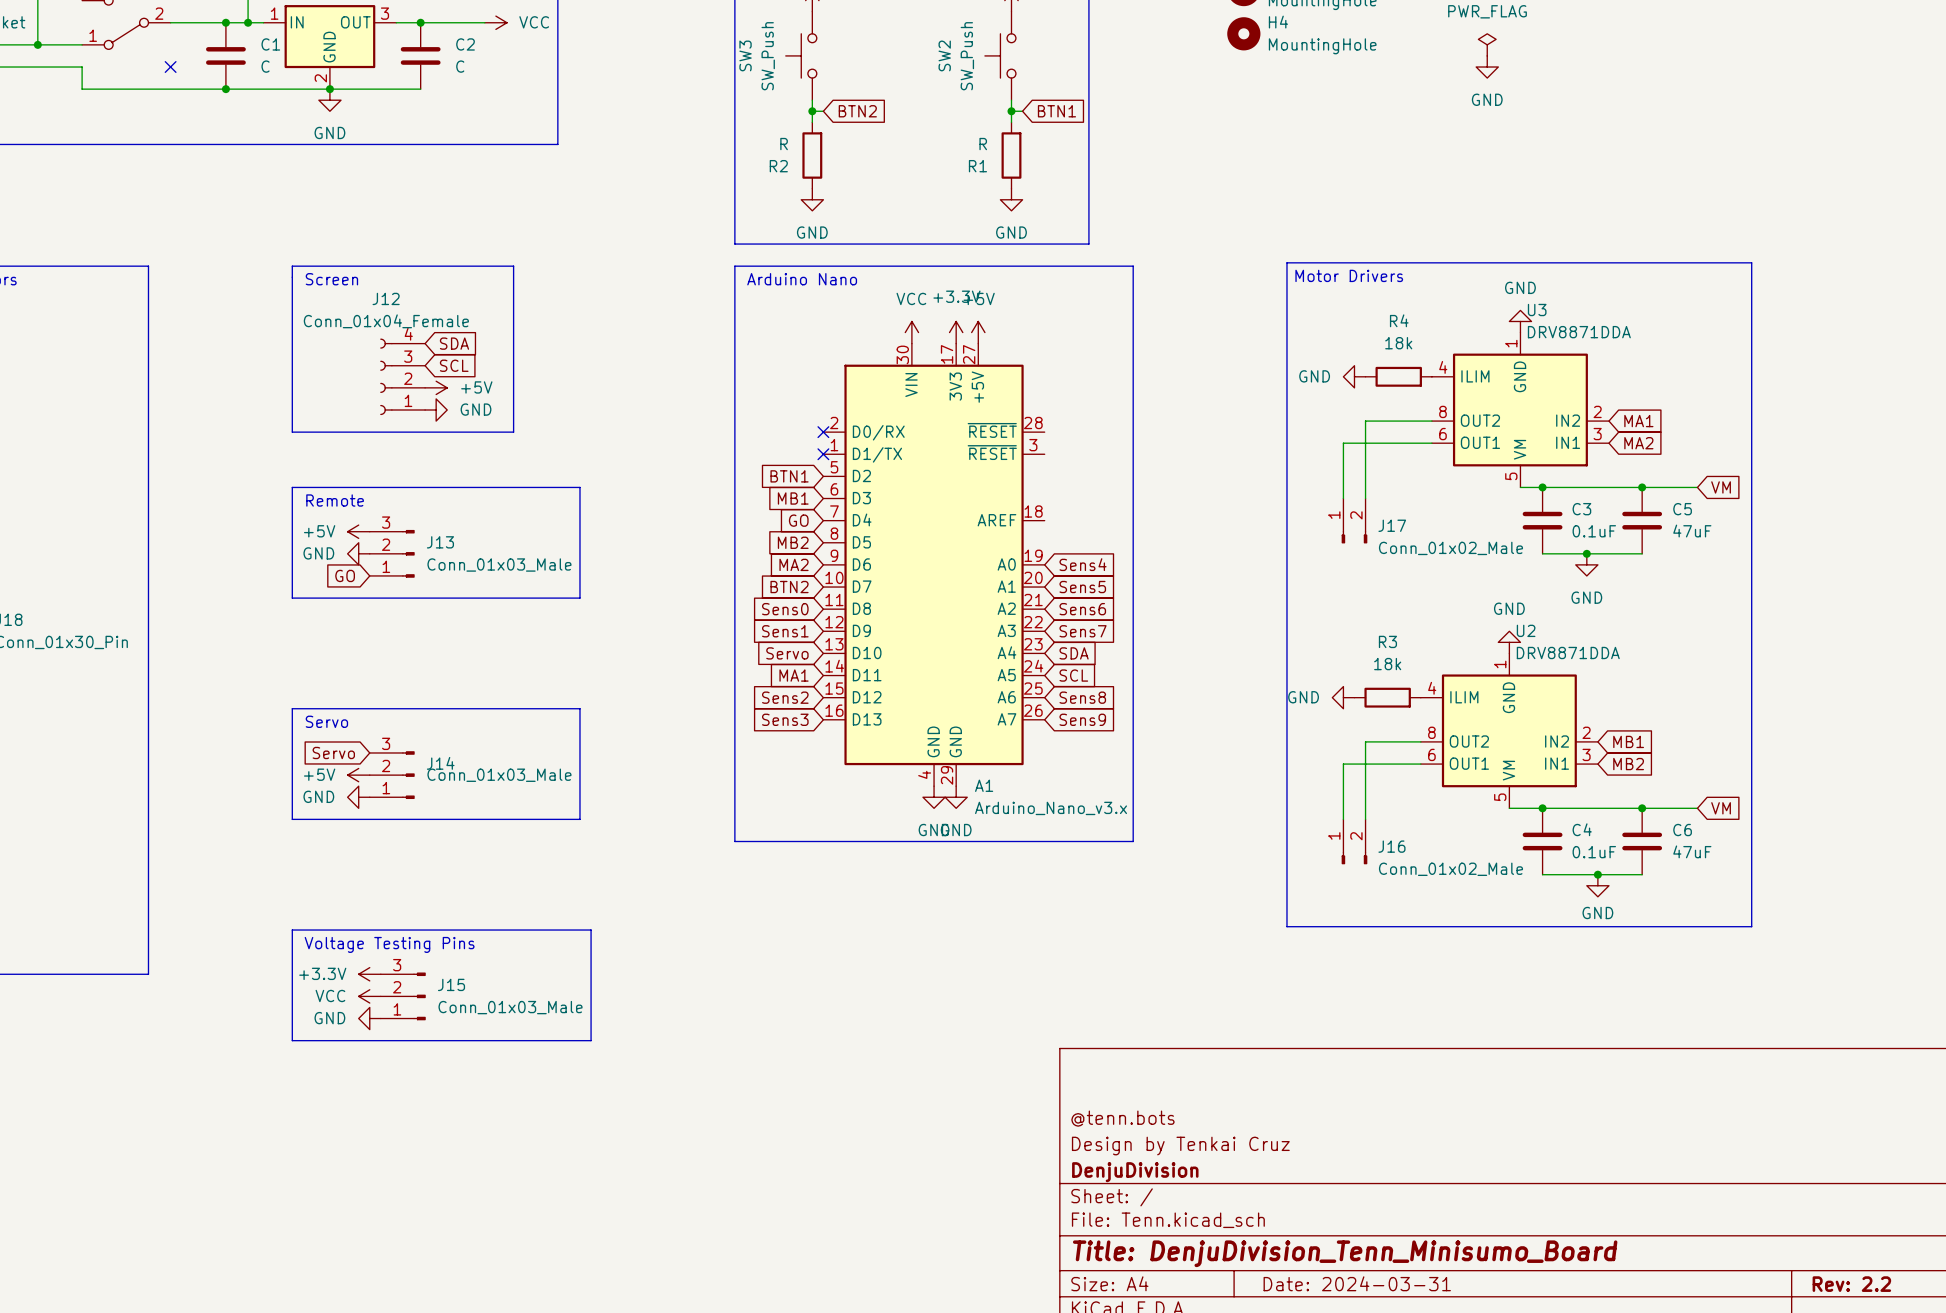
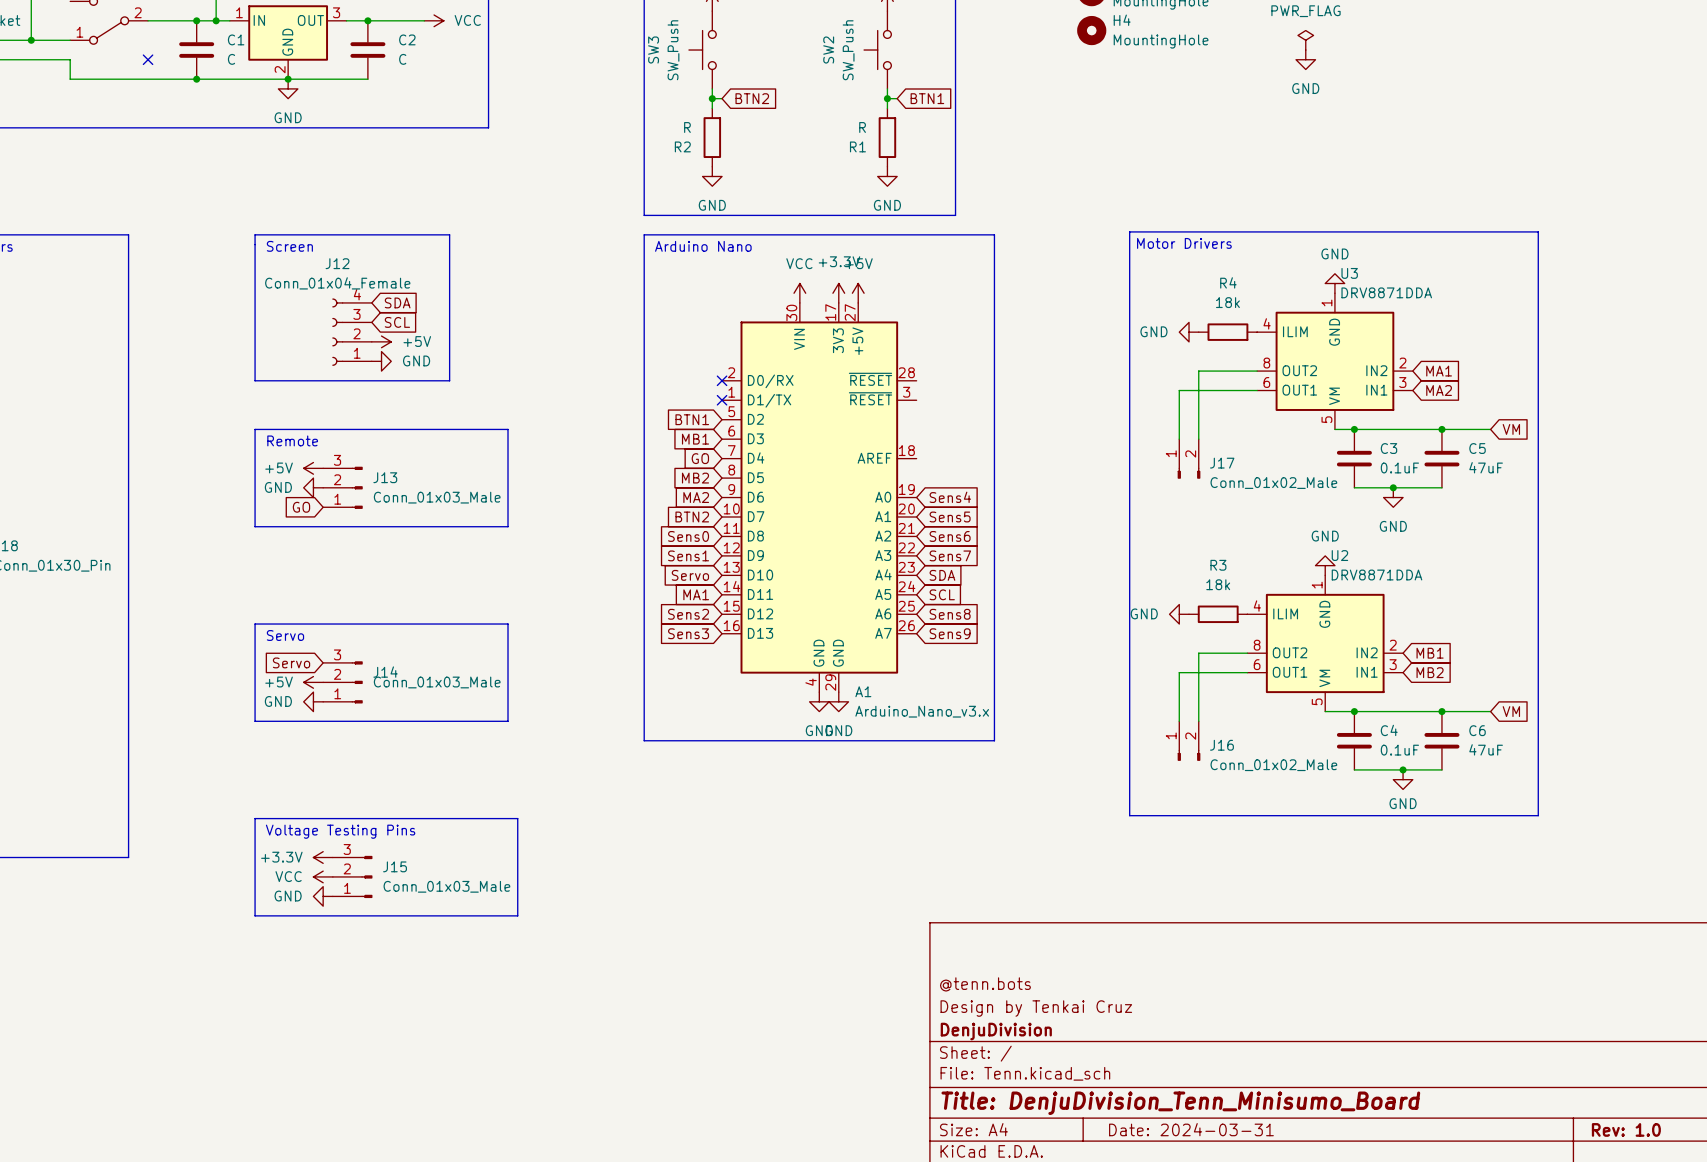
title block: Rev: 2.2 (1851, 1284) -> Rev: 1.0 (1626, 1129)

